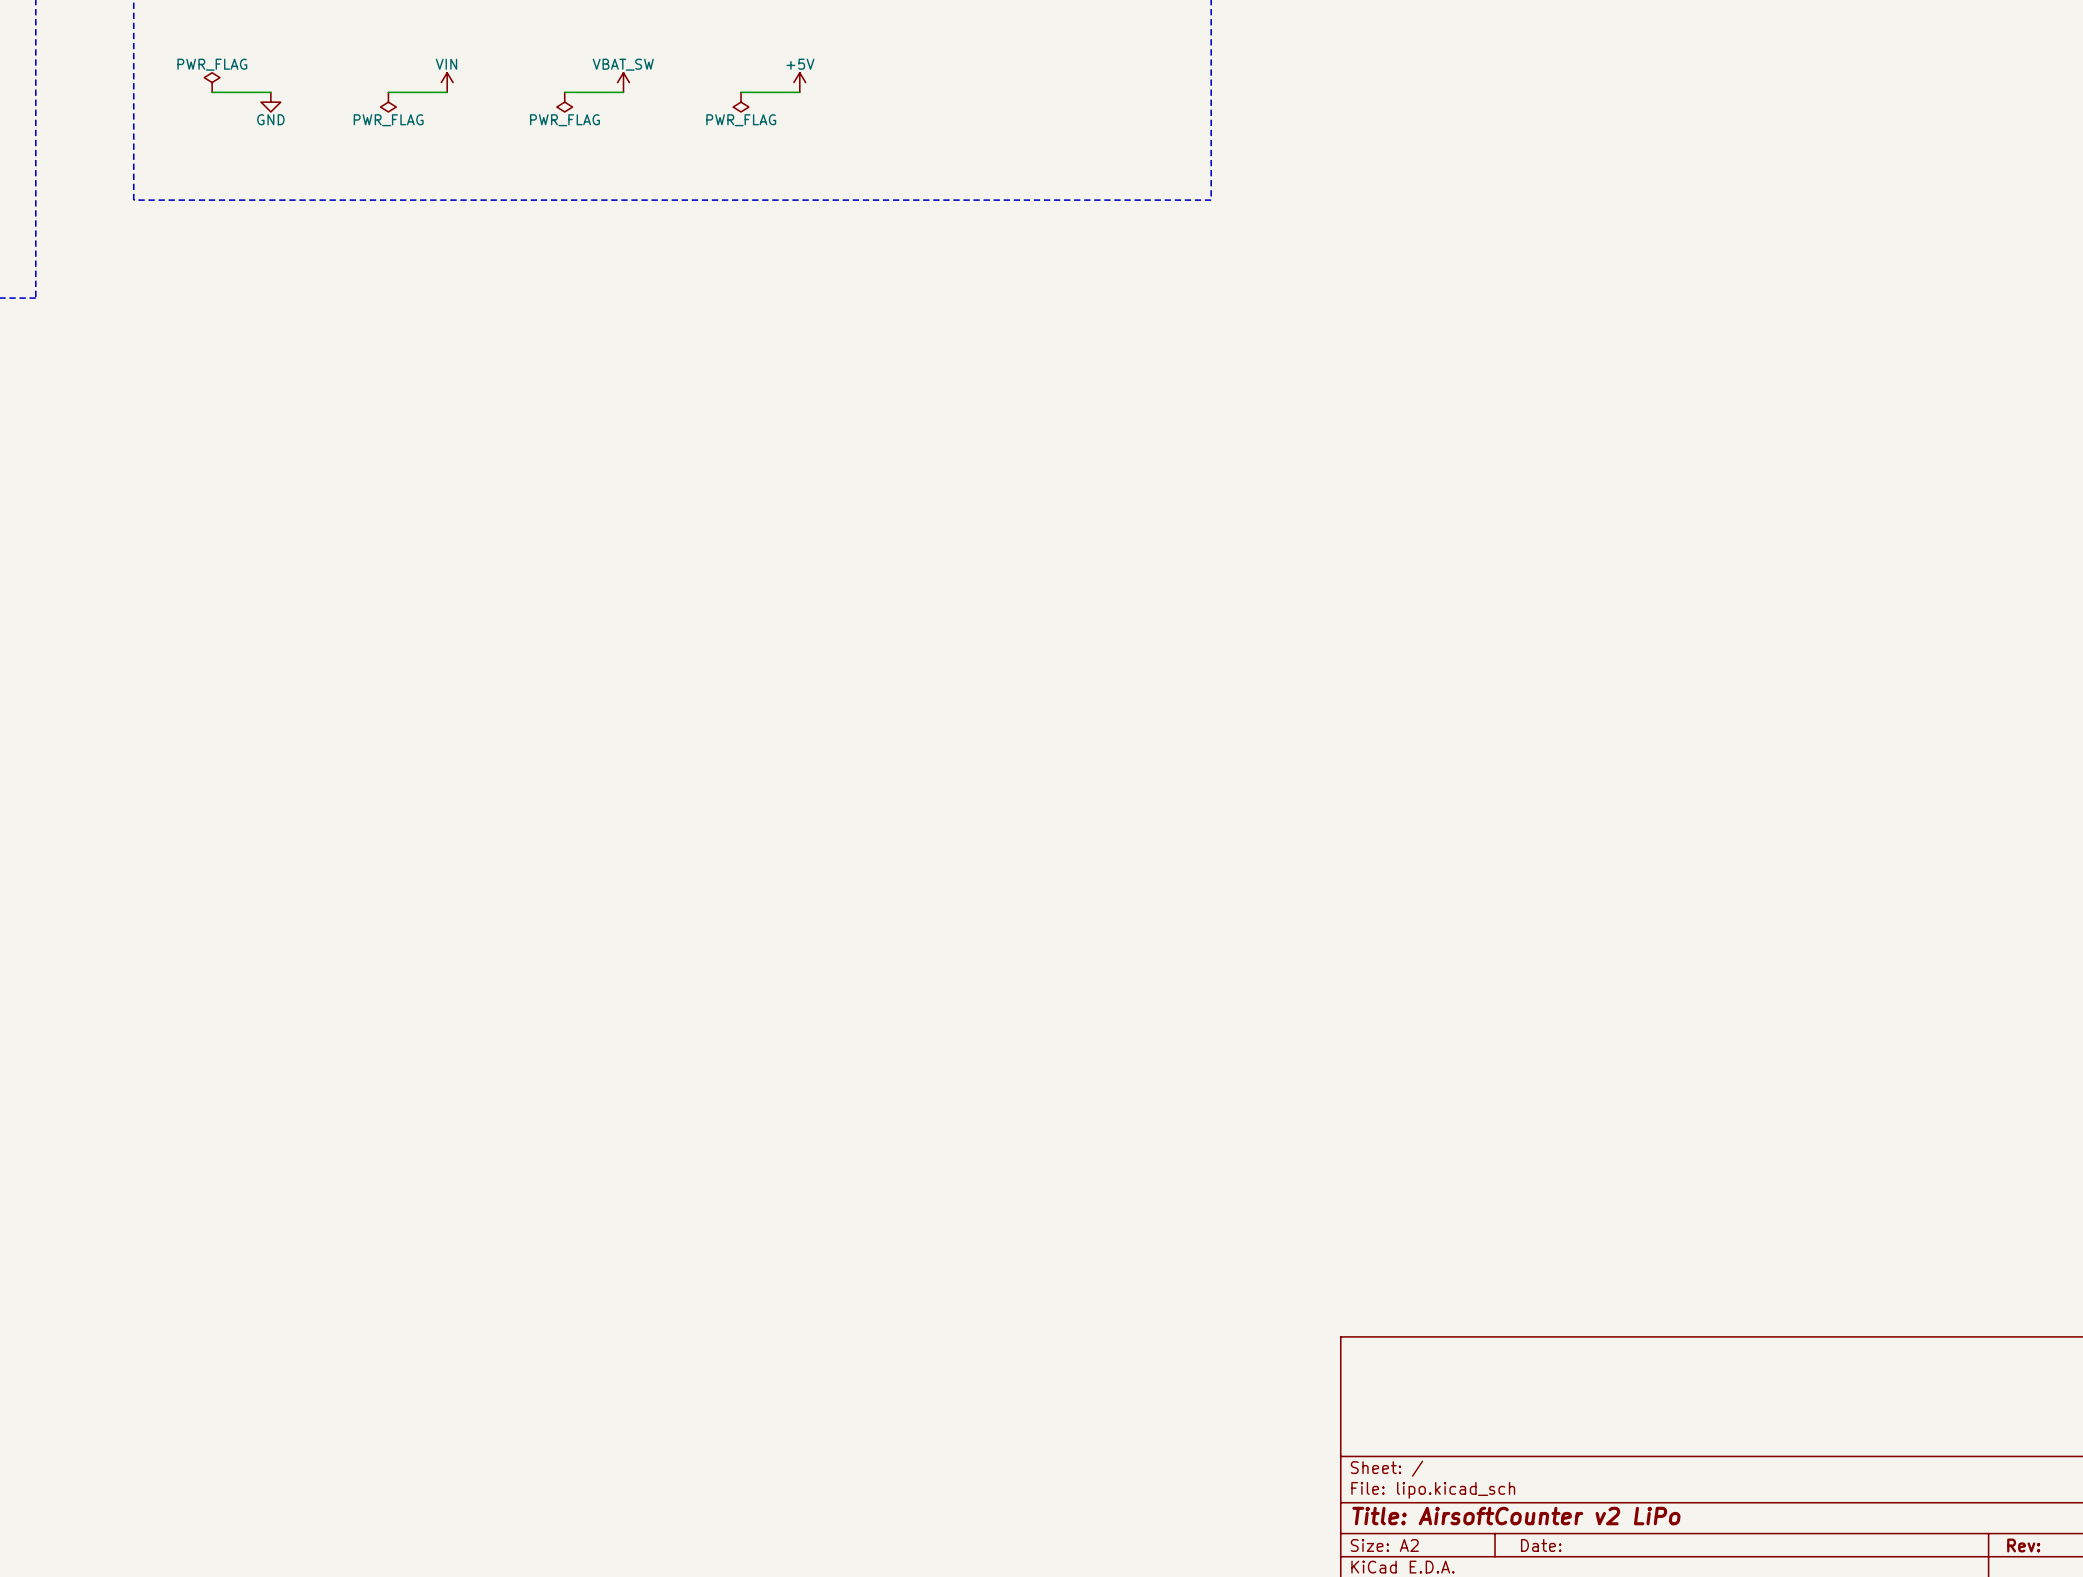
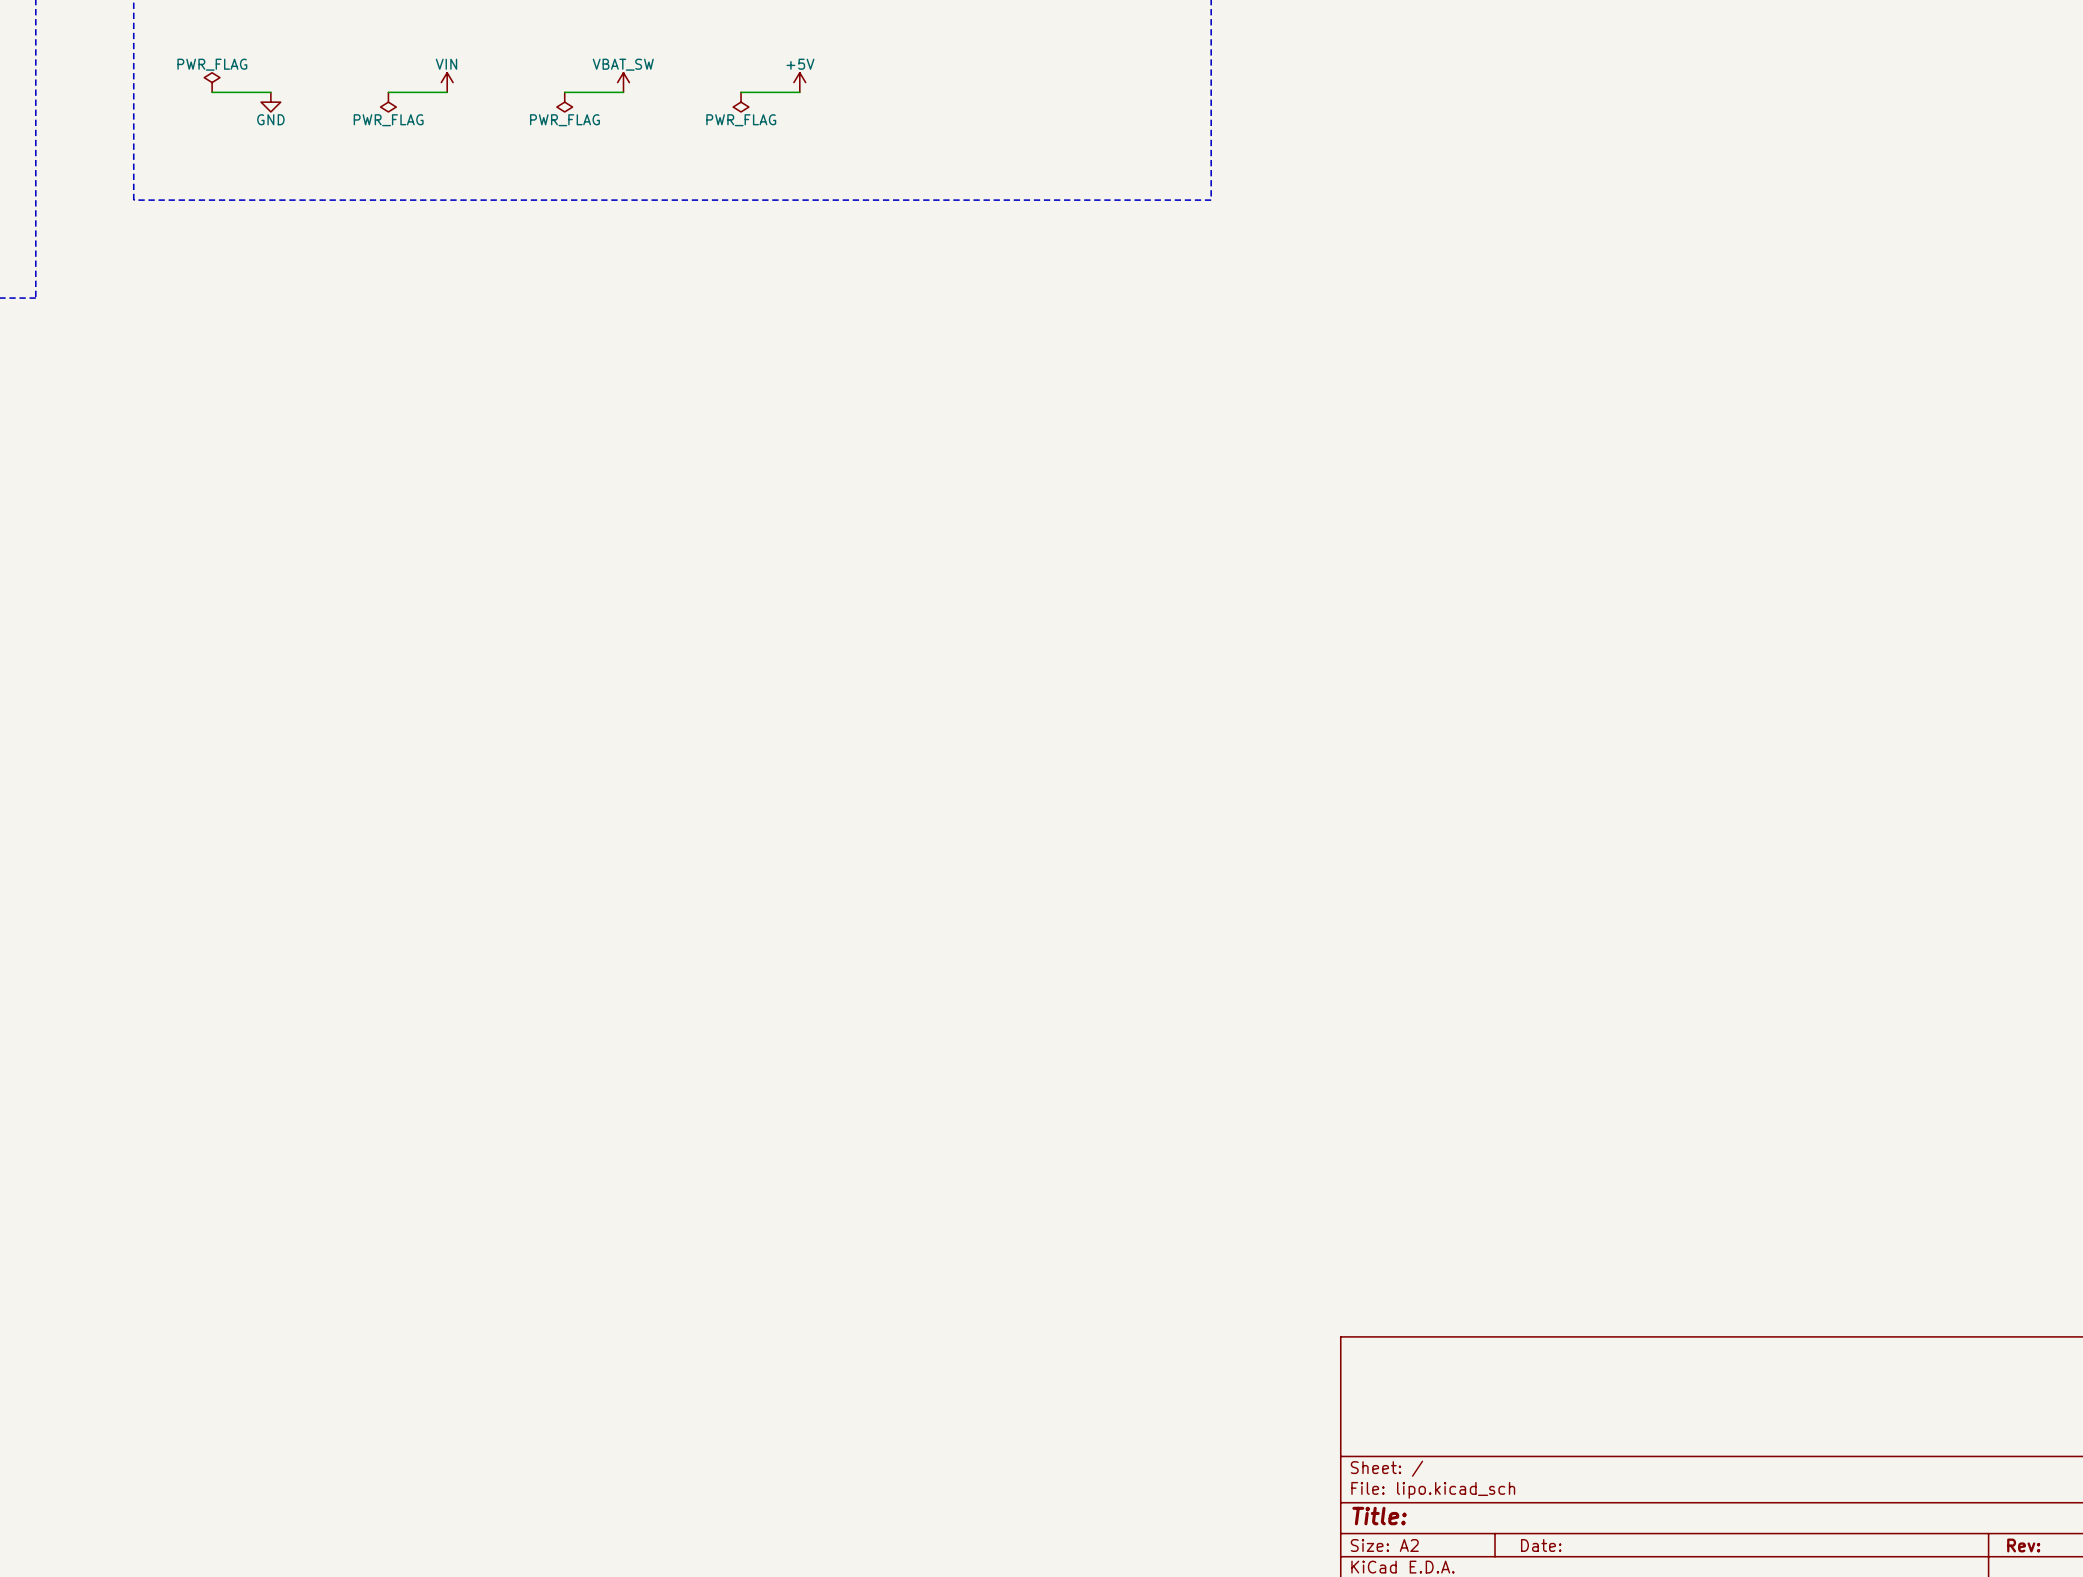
title block: Title: AirsoftCounter v2 LiPo (1516, 1516) -> Title: (1379, 1516)

